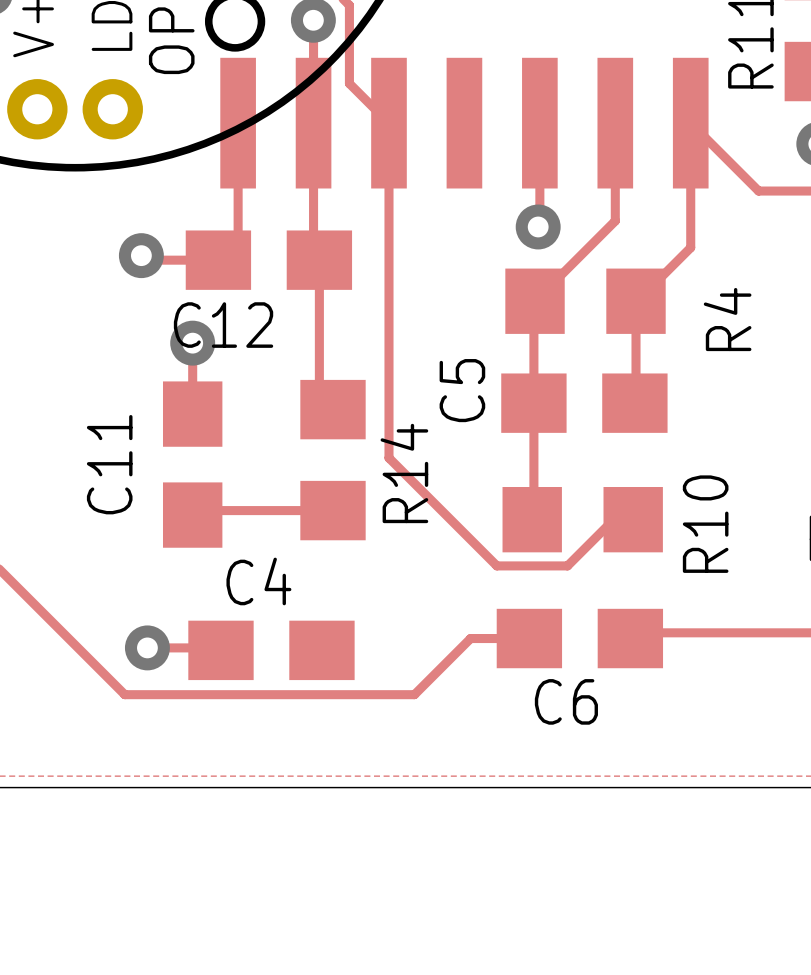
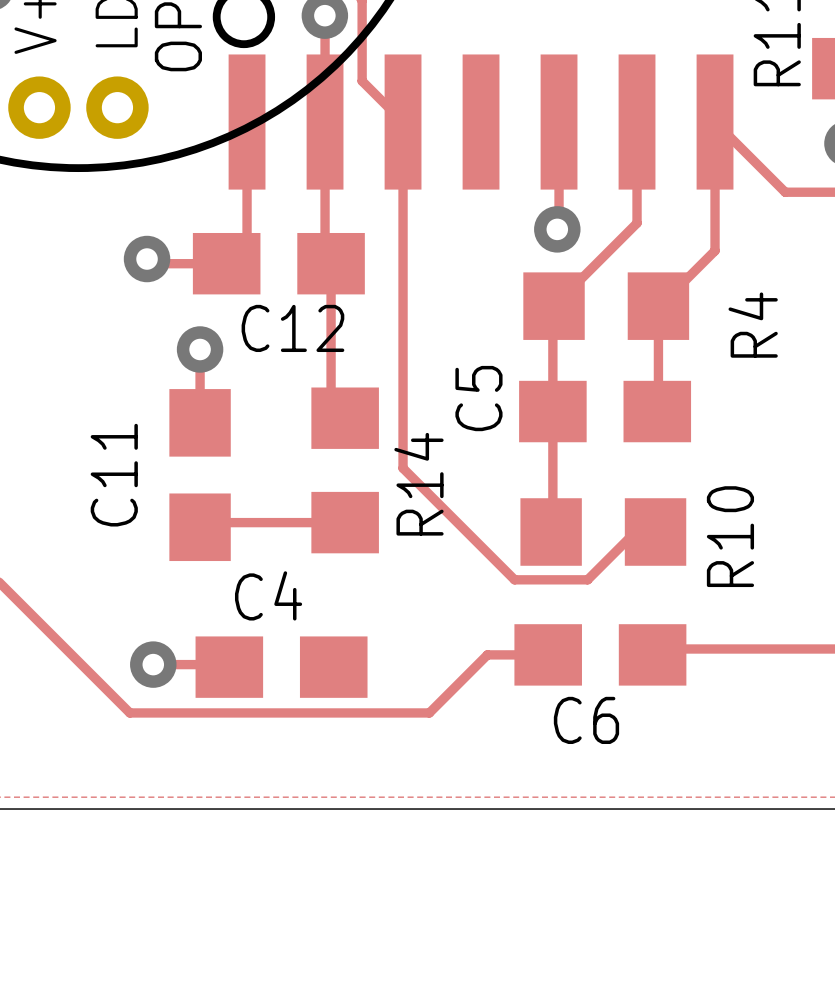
C12 name position: C12 (223, 325) -> C12 (292, 328)

